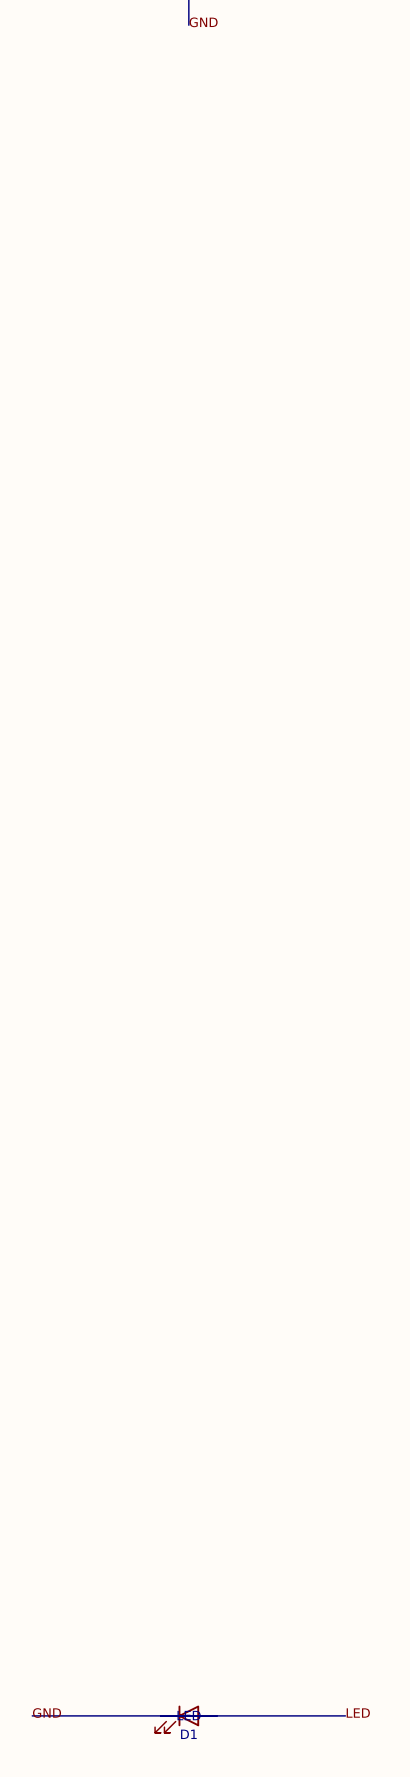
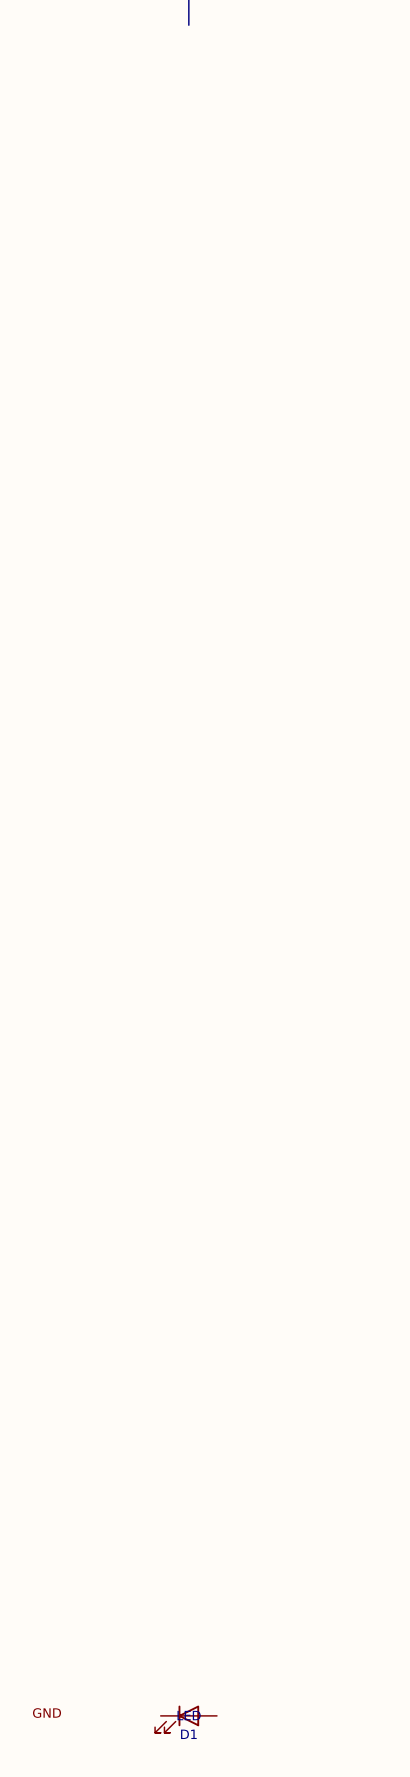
label: GND (203, 22) -> none
label: LED (358, 1713) -> none
wire: (32, 1715) (345, 1715) -> none

